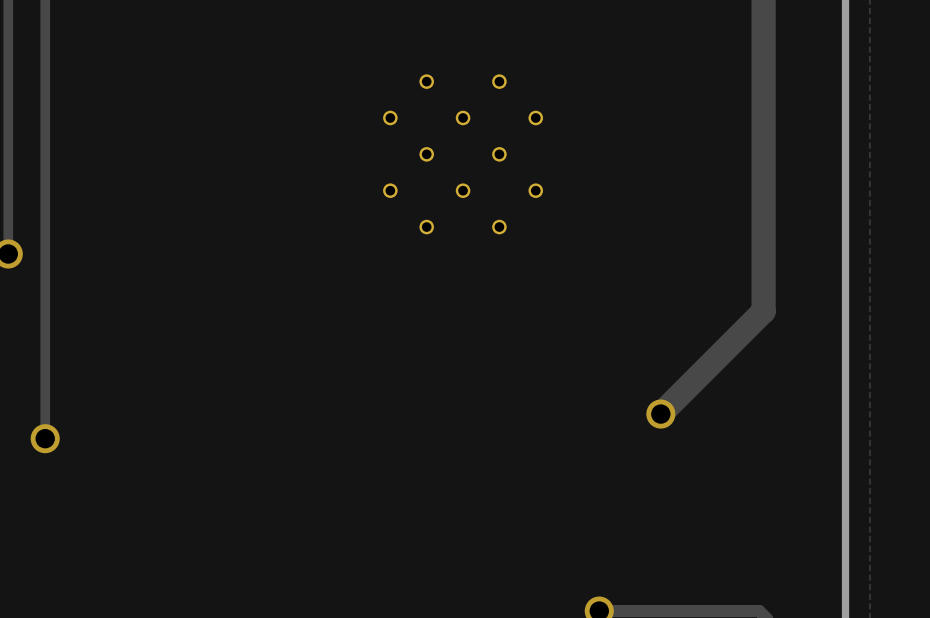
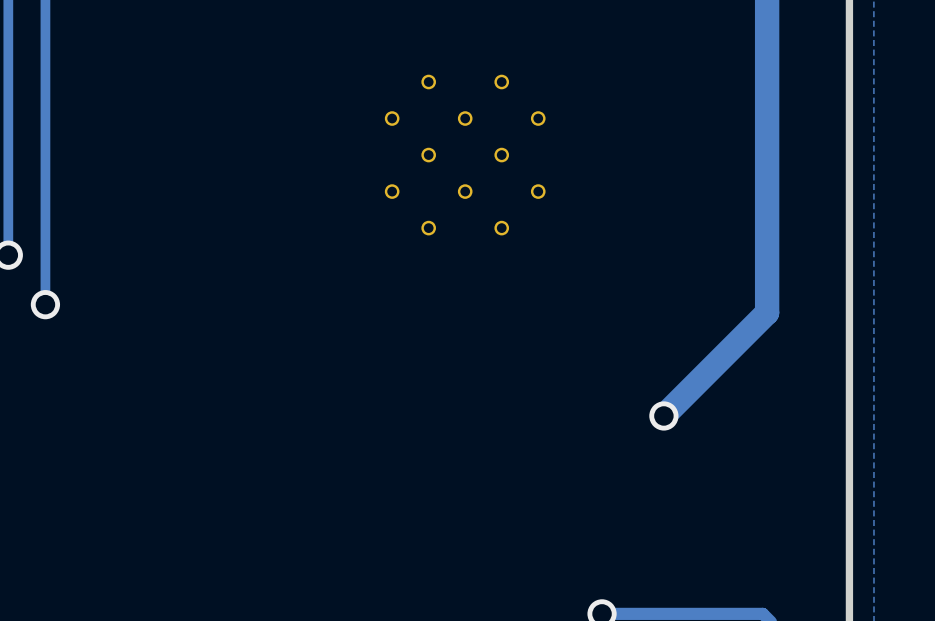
track: (45, 303) (45, 438) -> none
via: none -> (45, 304)
via: (45, 438) -> none

